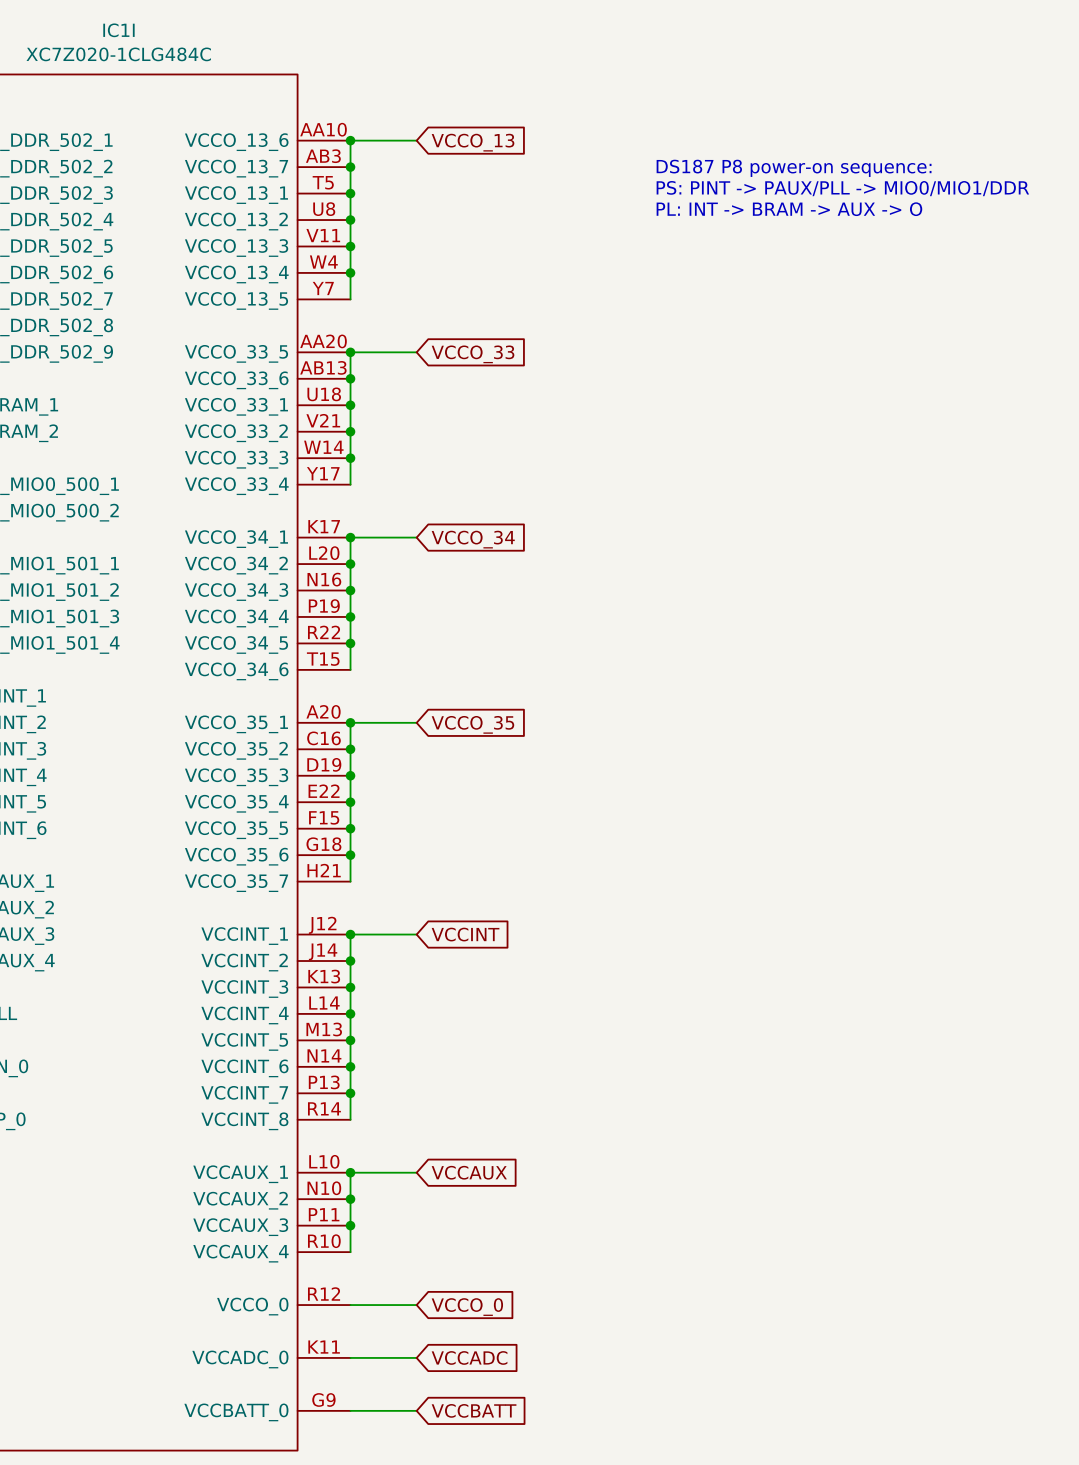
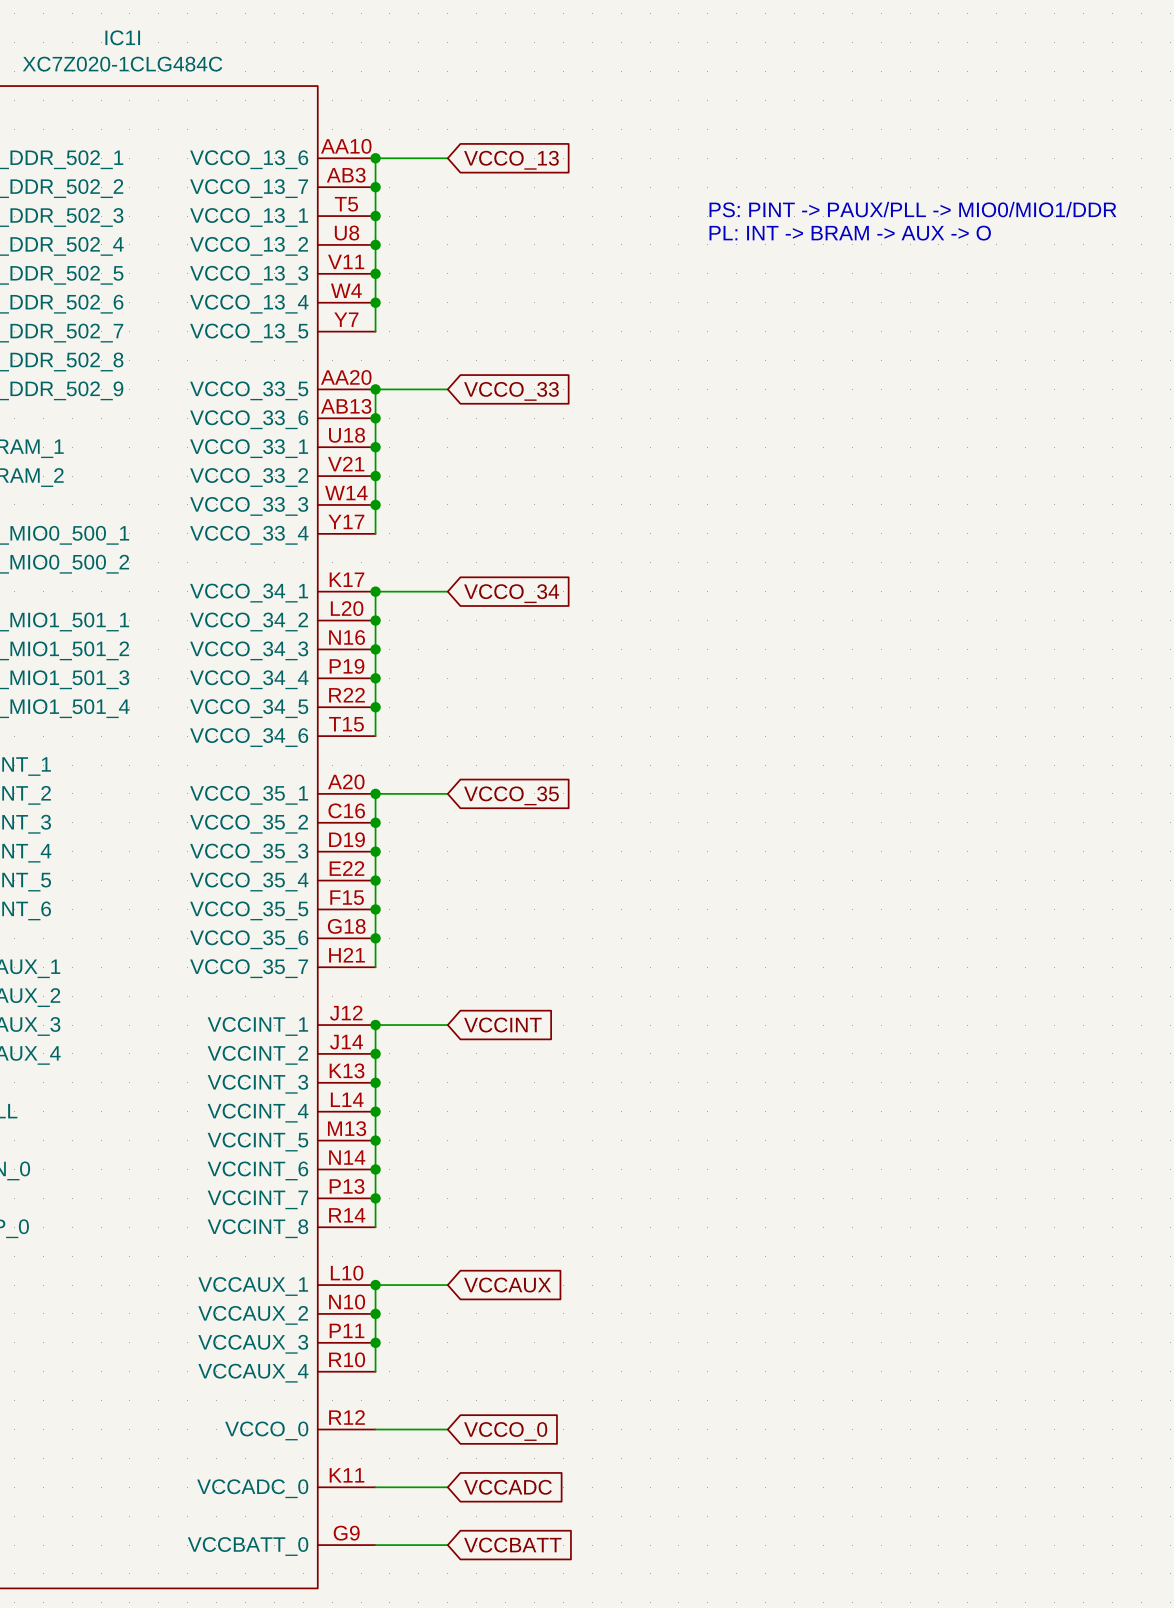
text: DS187 P8 power-on sequence: (794, 168) -> none

